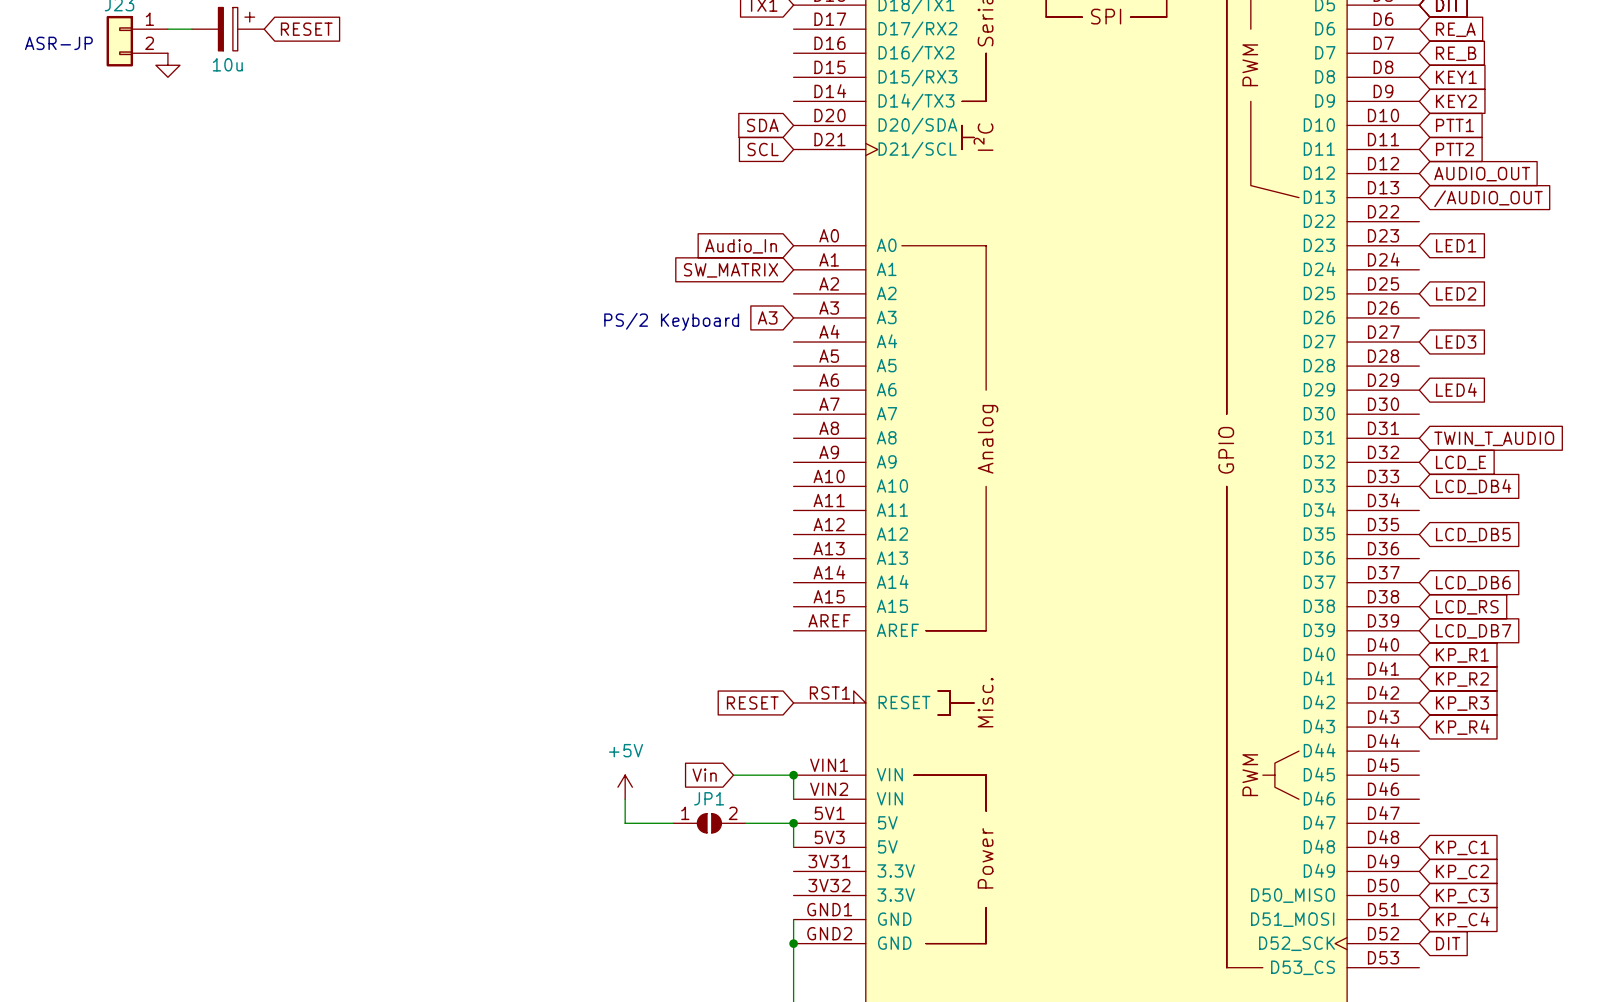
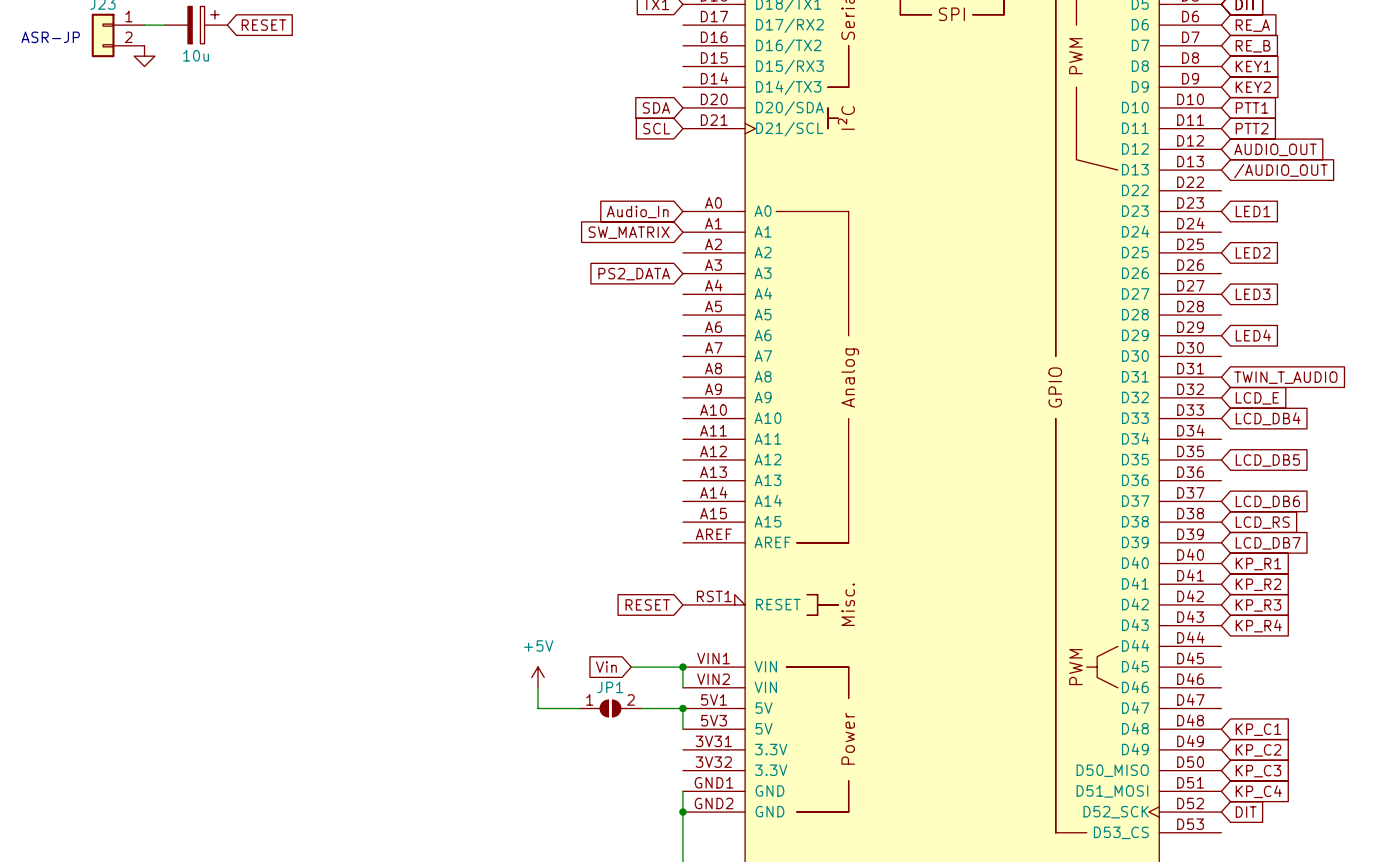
global label: A3 (767, 317) -> PS2_DATA (634, 274)
text: PS/2 Keyboard (671, 321) -> none

